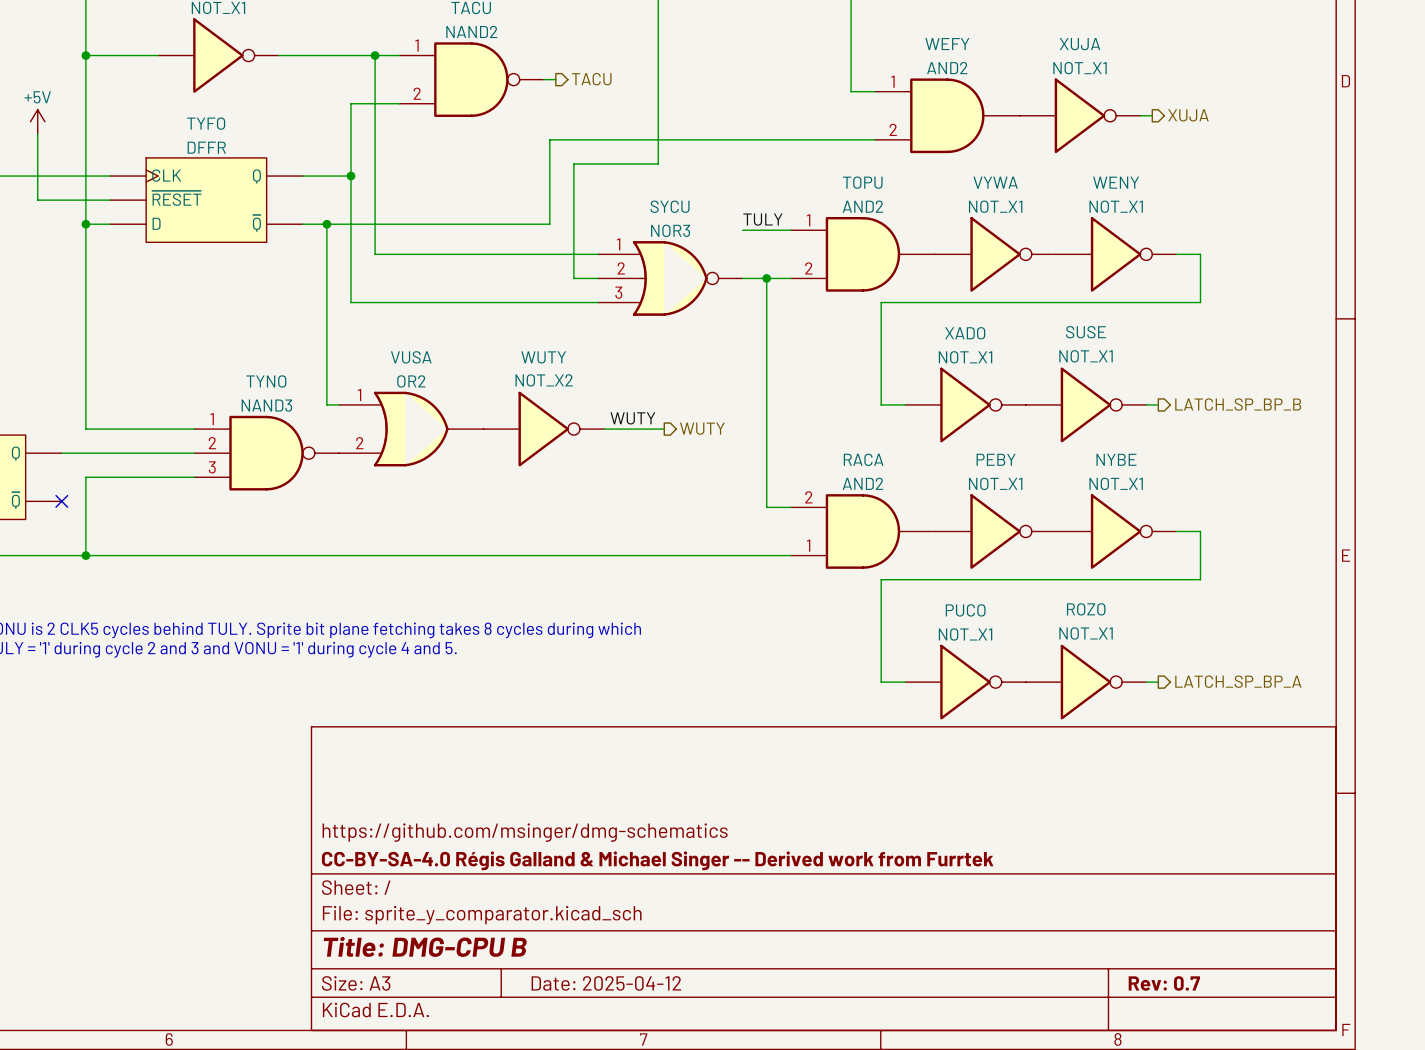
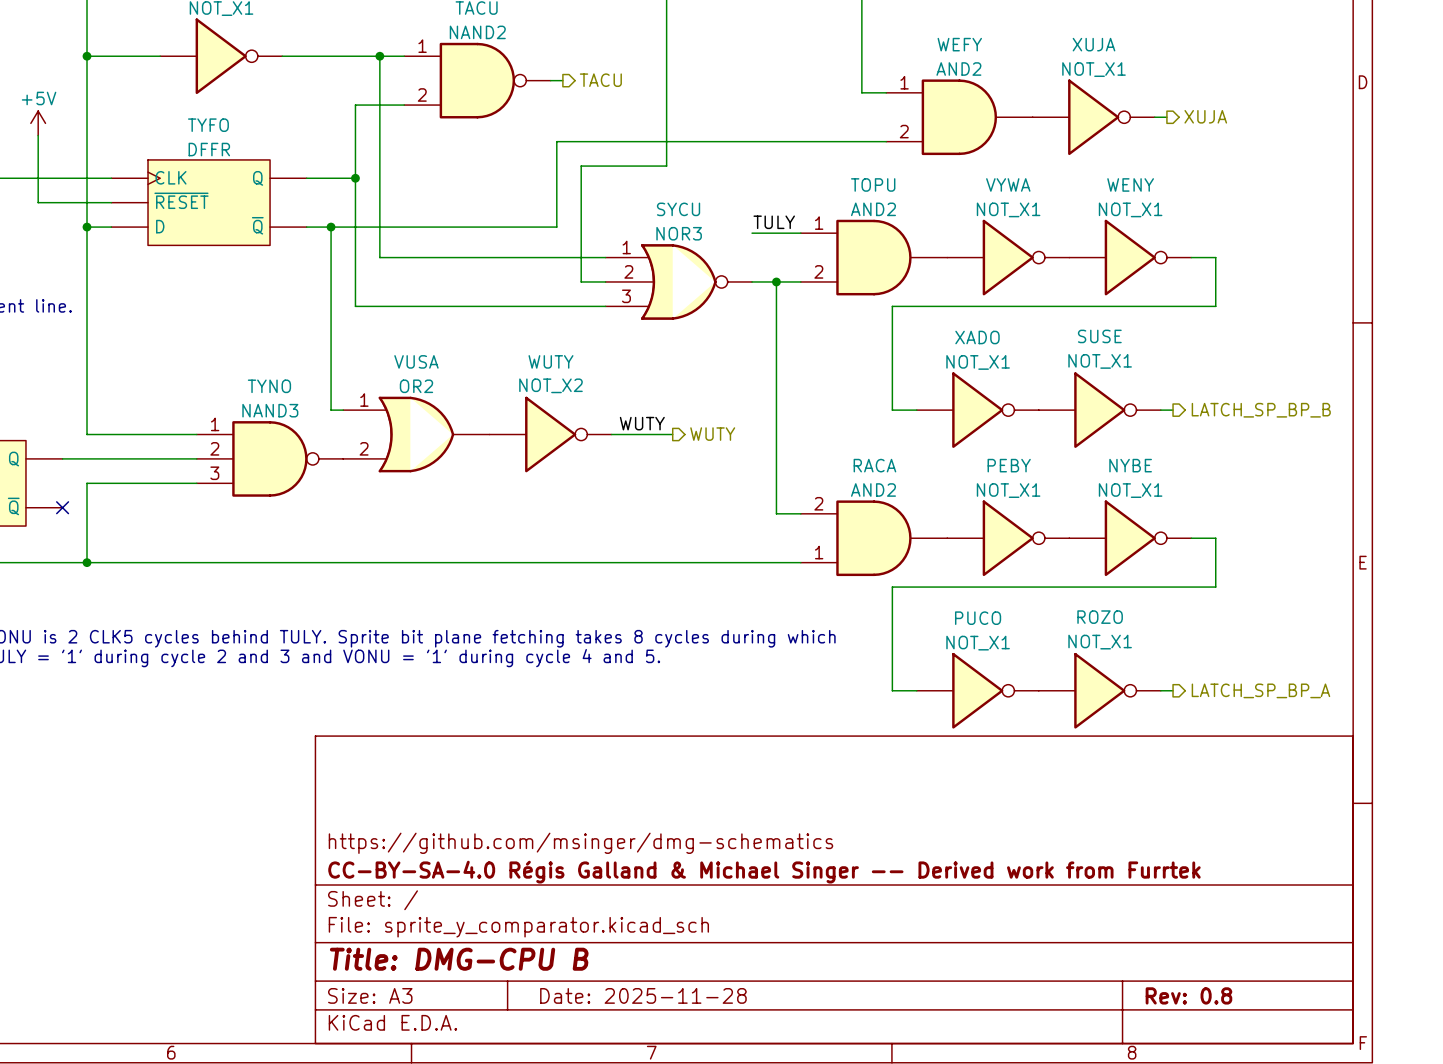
title block: Date: 2025-04-12 (606, 983) -> Date: 2025-11-28 (643, 995)
title block: Rev: 0.7 (1164, 983) -> Rev: 0.8 (1188, 995)

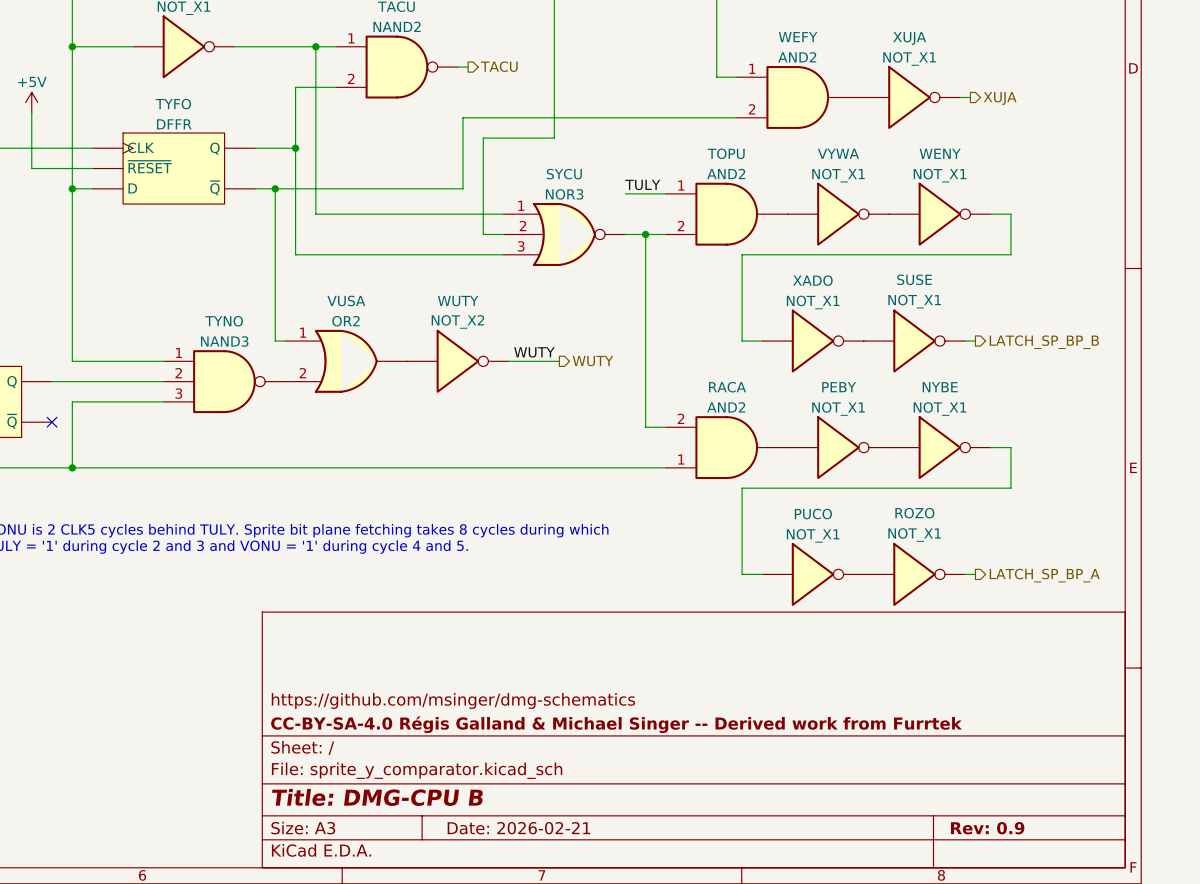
title block: Date: 2025-11-28 (643, 995) -> Date: 2026-02-21 (518, 828)
title block: Rev: 0.8 (1188, 995) -> Rev: 0.9 (987, 828)

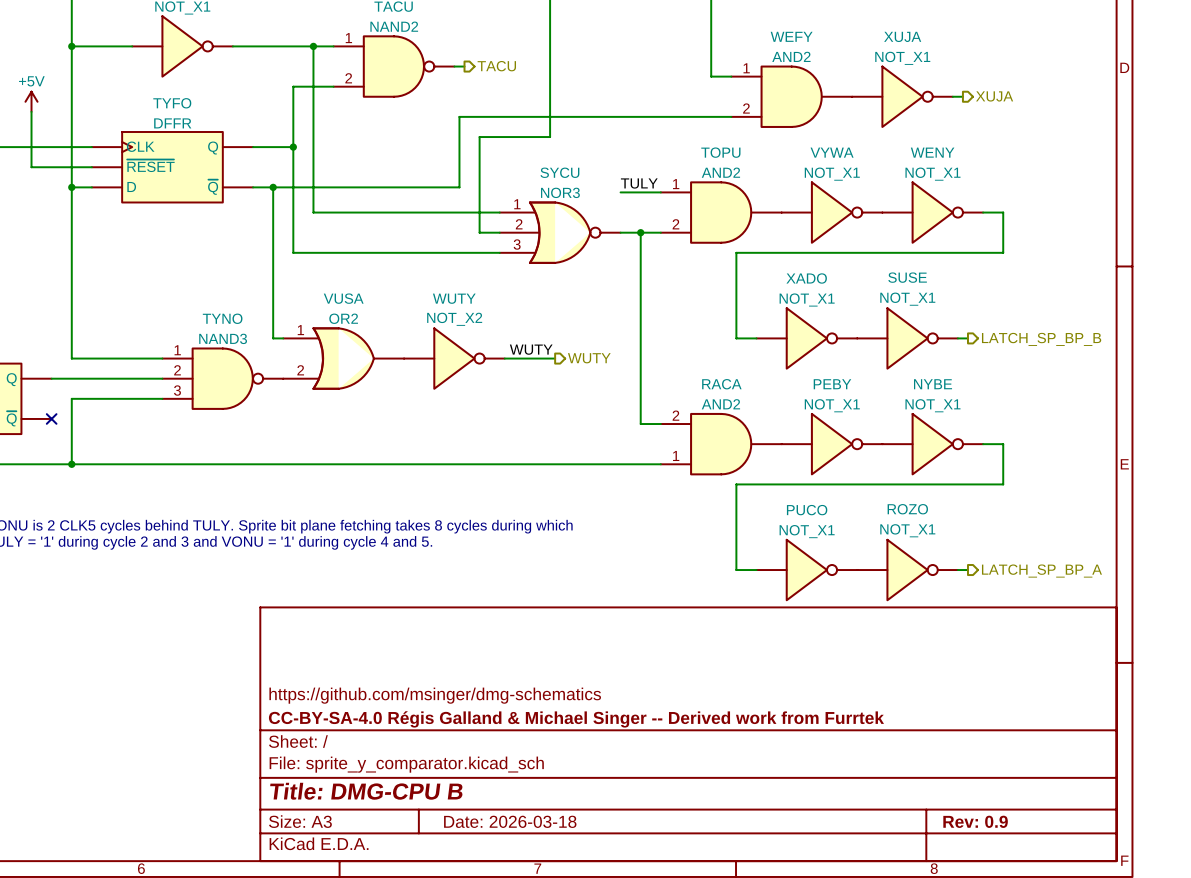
title block: Date: 2026-02-21 (518, 828) -> Date: 2026-03-18 (510, 821)

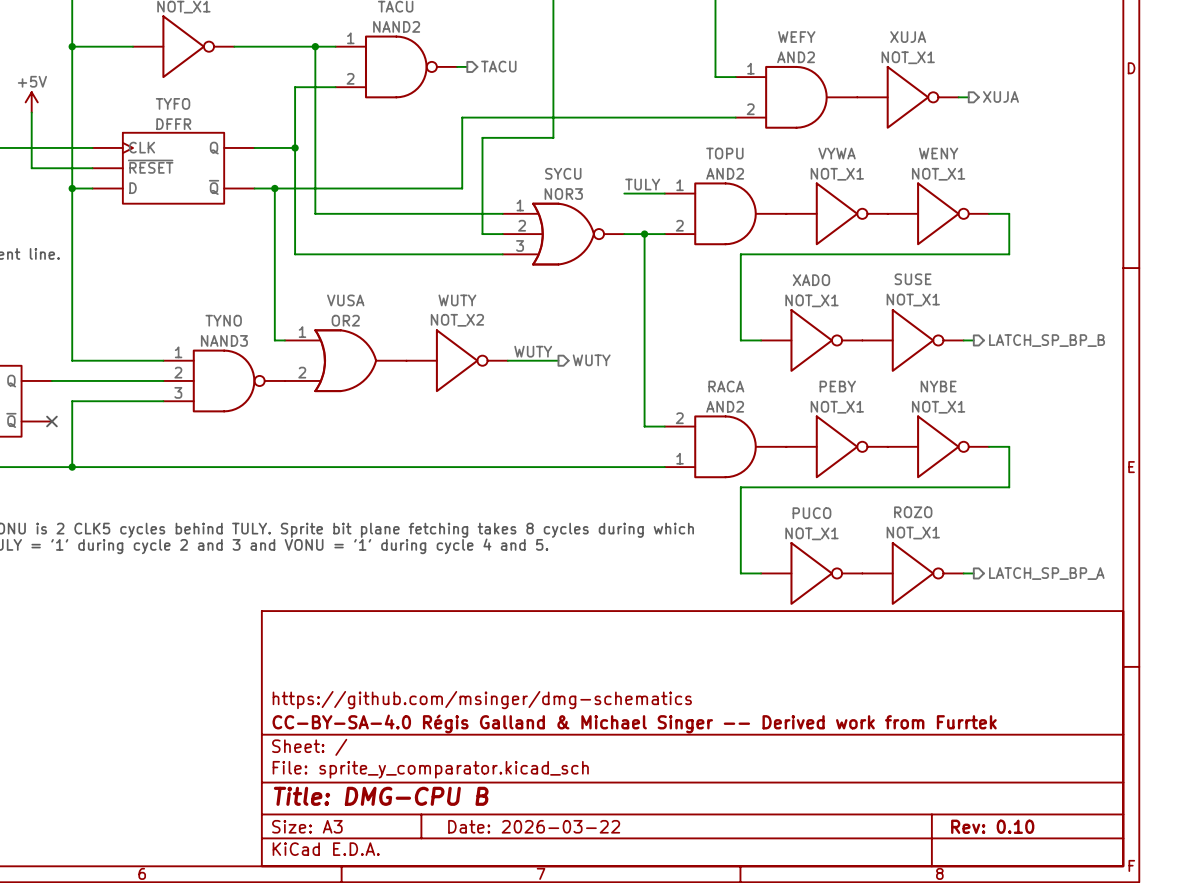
title block: Date: 2026-03-18 (510, 821) -> Date: 2026-03-22 (534, 826)
title block: Rev: 0.9 (975, 821) -> Rev: 0.10 (992, 826)

